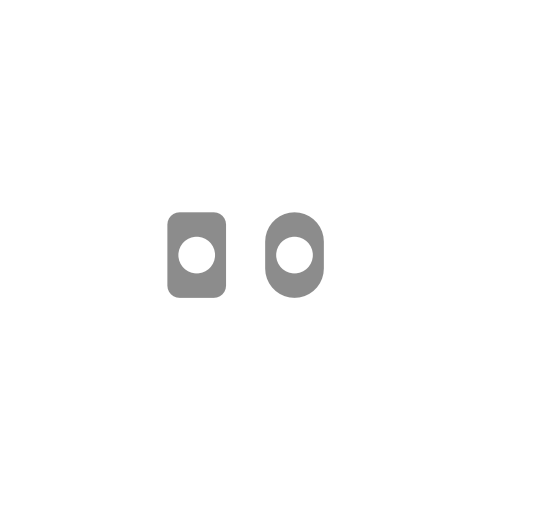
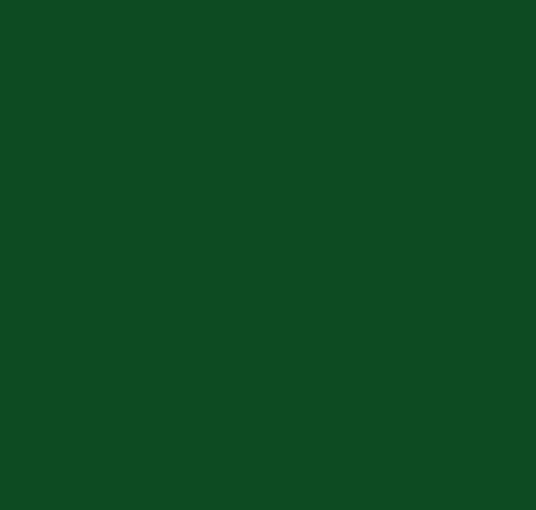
part: (245, 255) -> none

